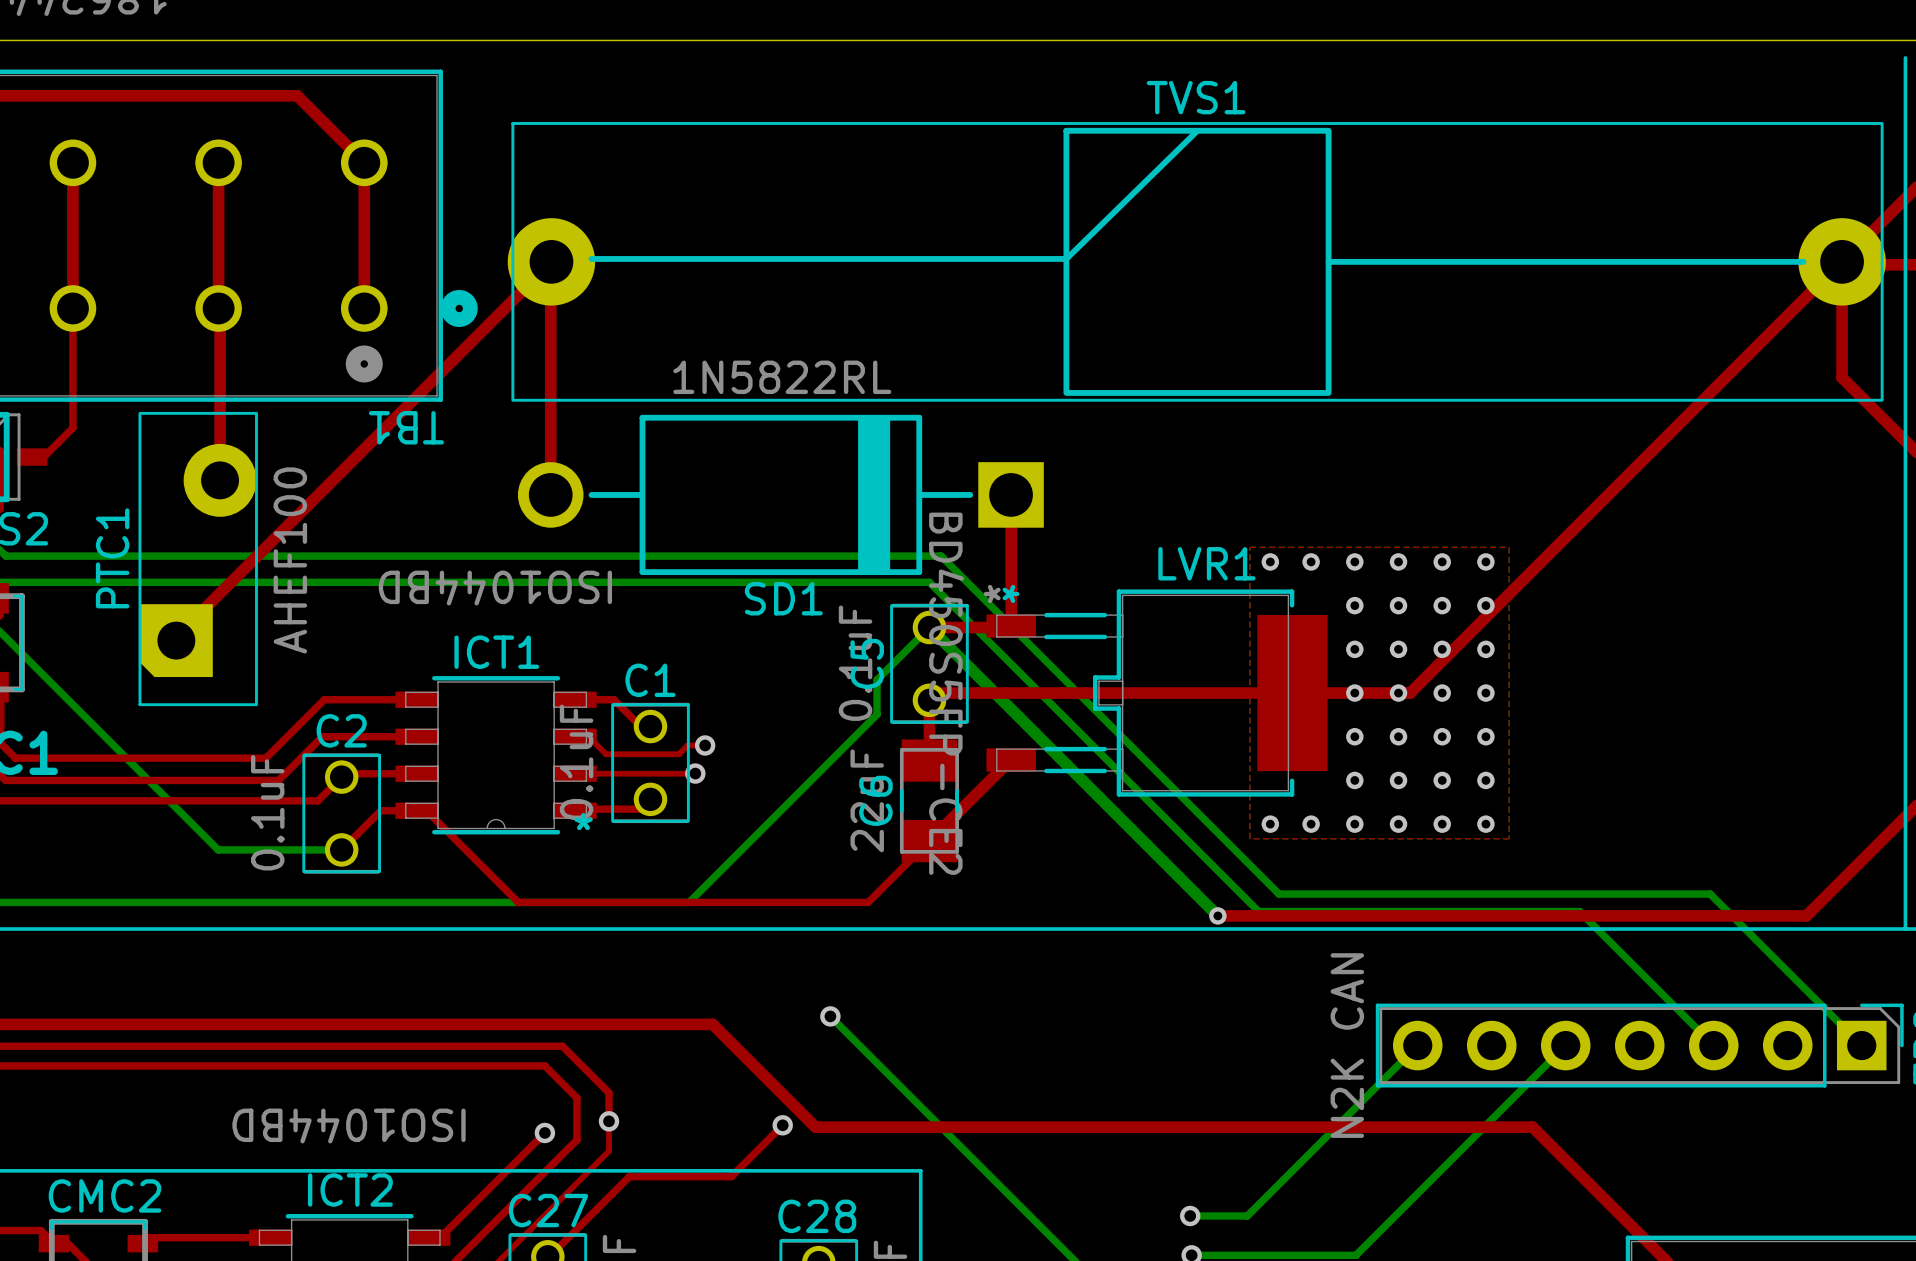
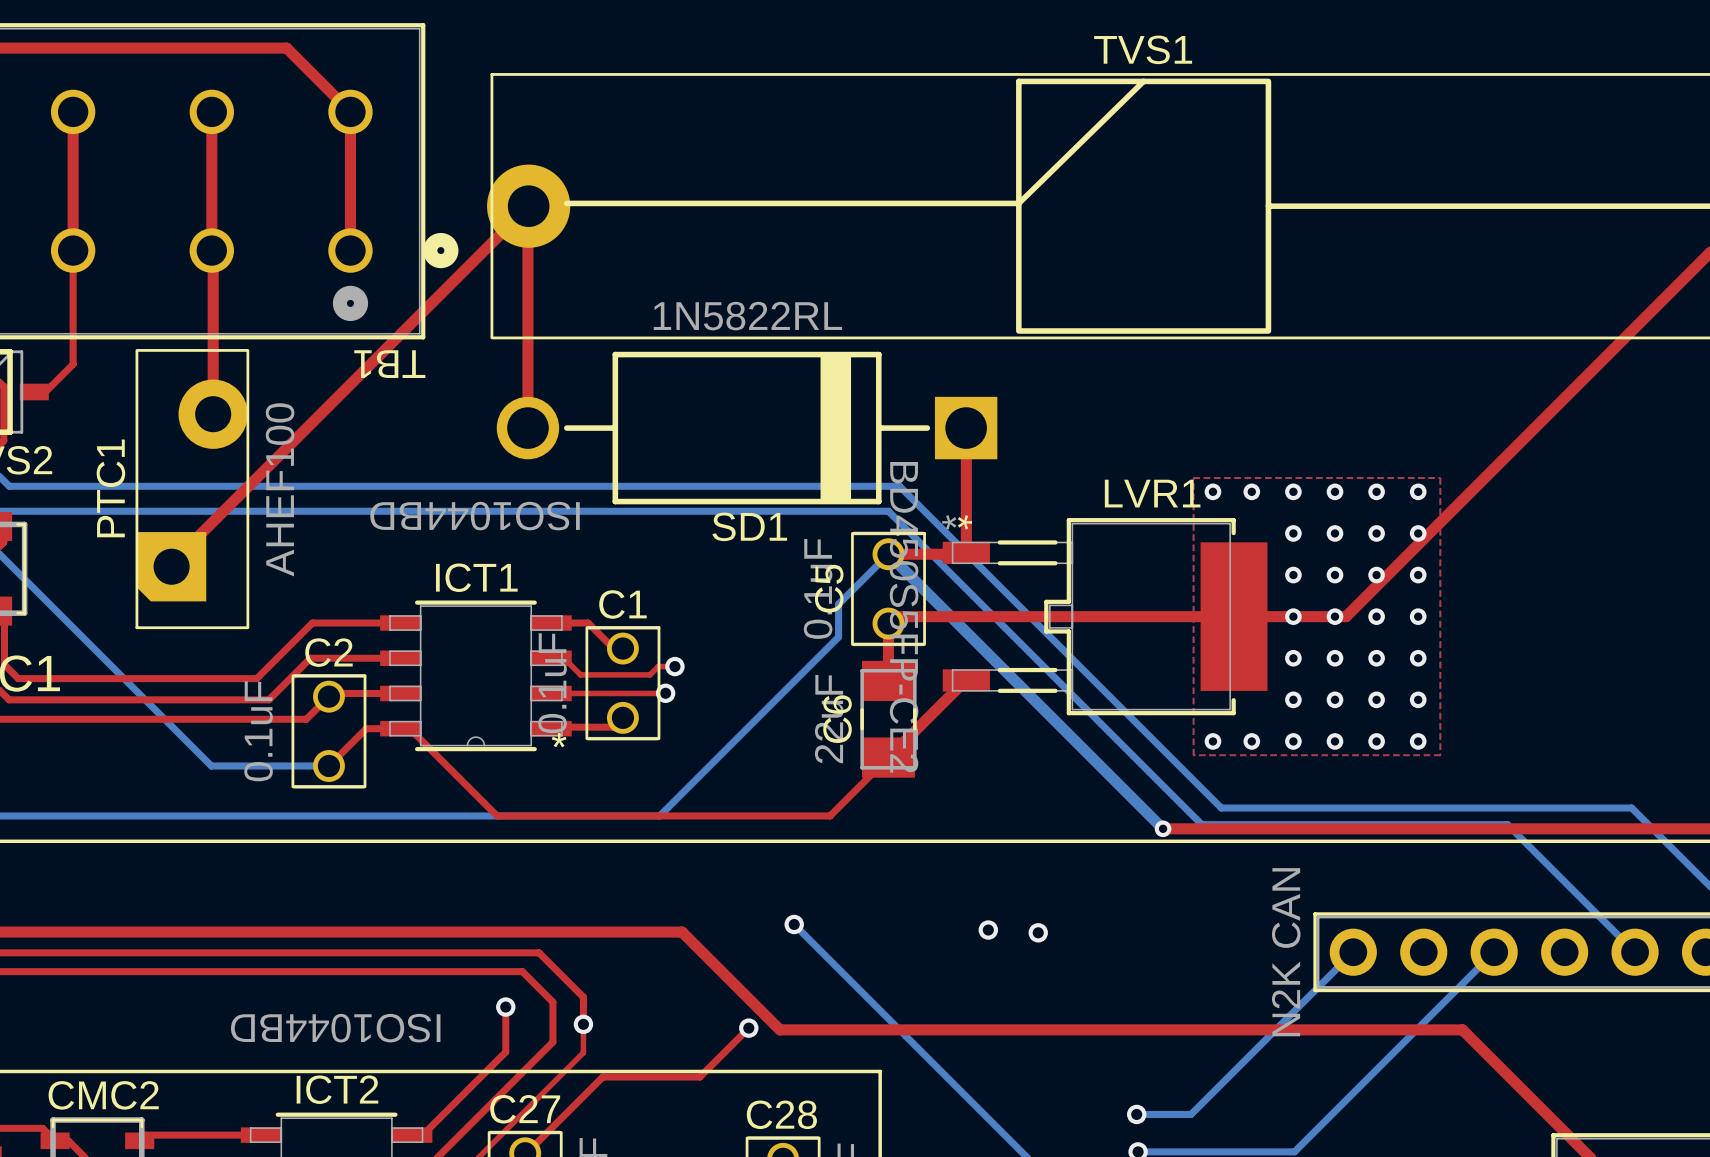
via: none -> (988, 930)
via: none -> (1038, 932)
top track: (544, 1132) (527, 1150) -> (505, 1007) (505, 1052)
via position: (544, 1132) -> (505, 1007)

